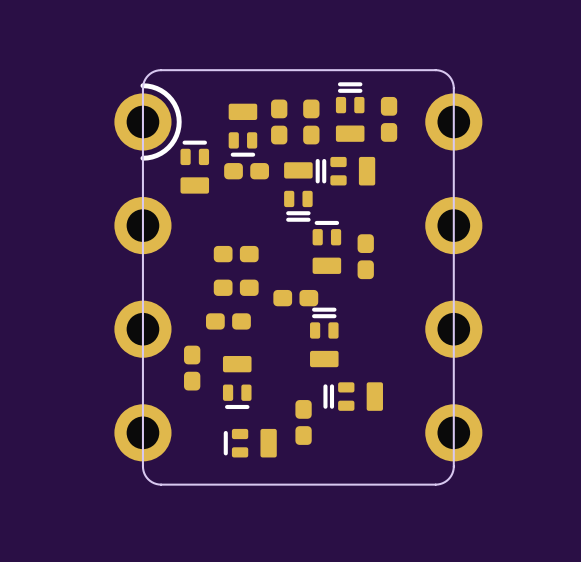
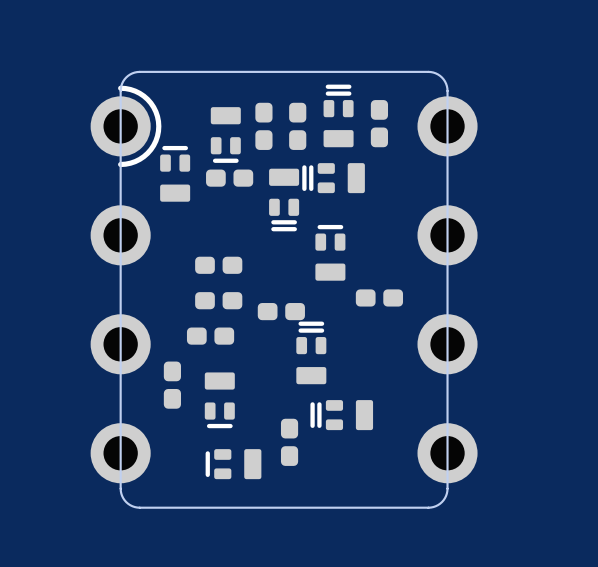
part position: (326, 247) -> (330, 252)
part rotation: 0° (365, 256) -> 90° clockwise (379, 297)
part position: (365, 256) -> (379, 297)

